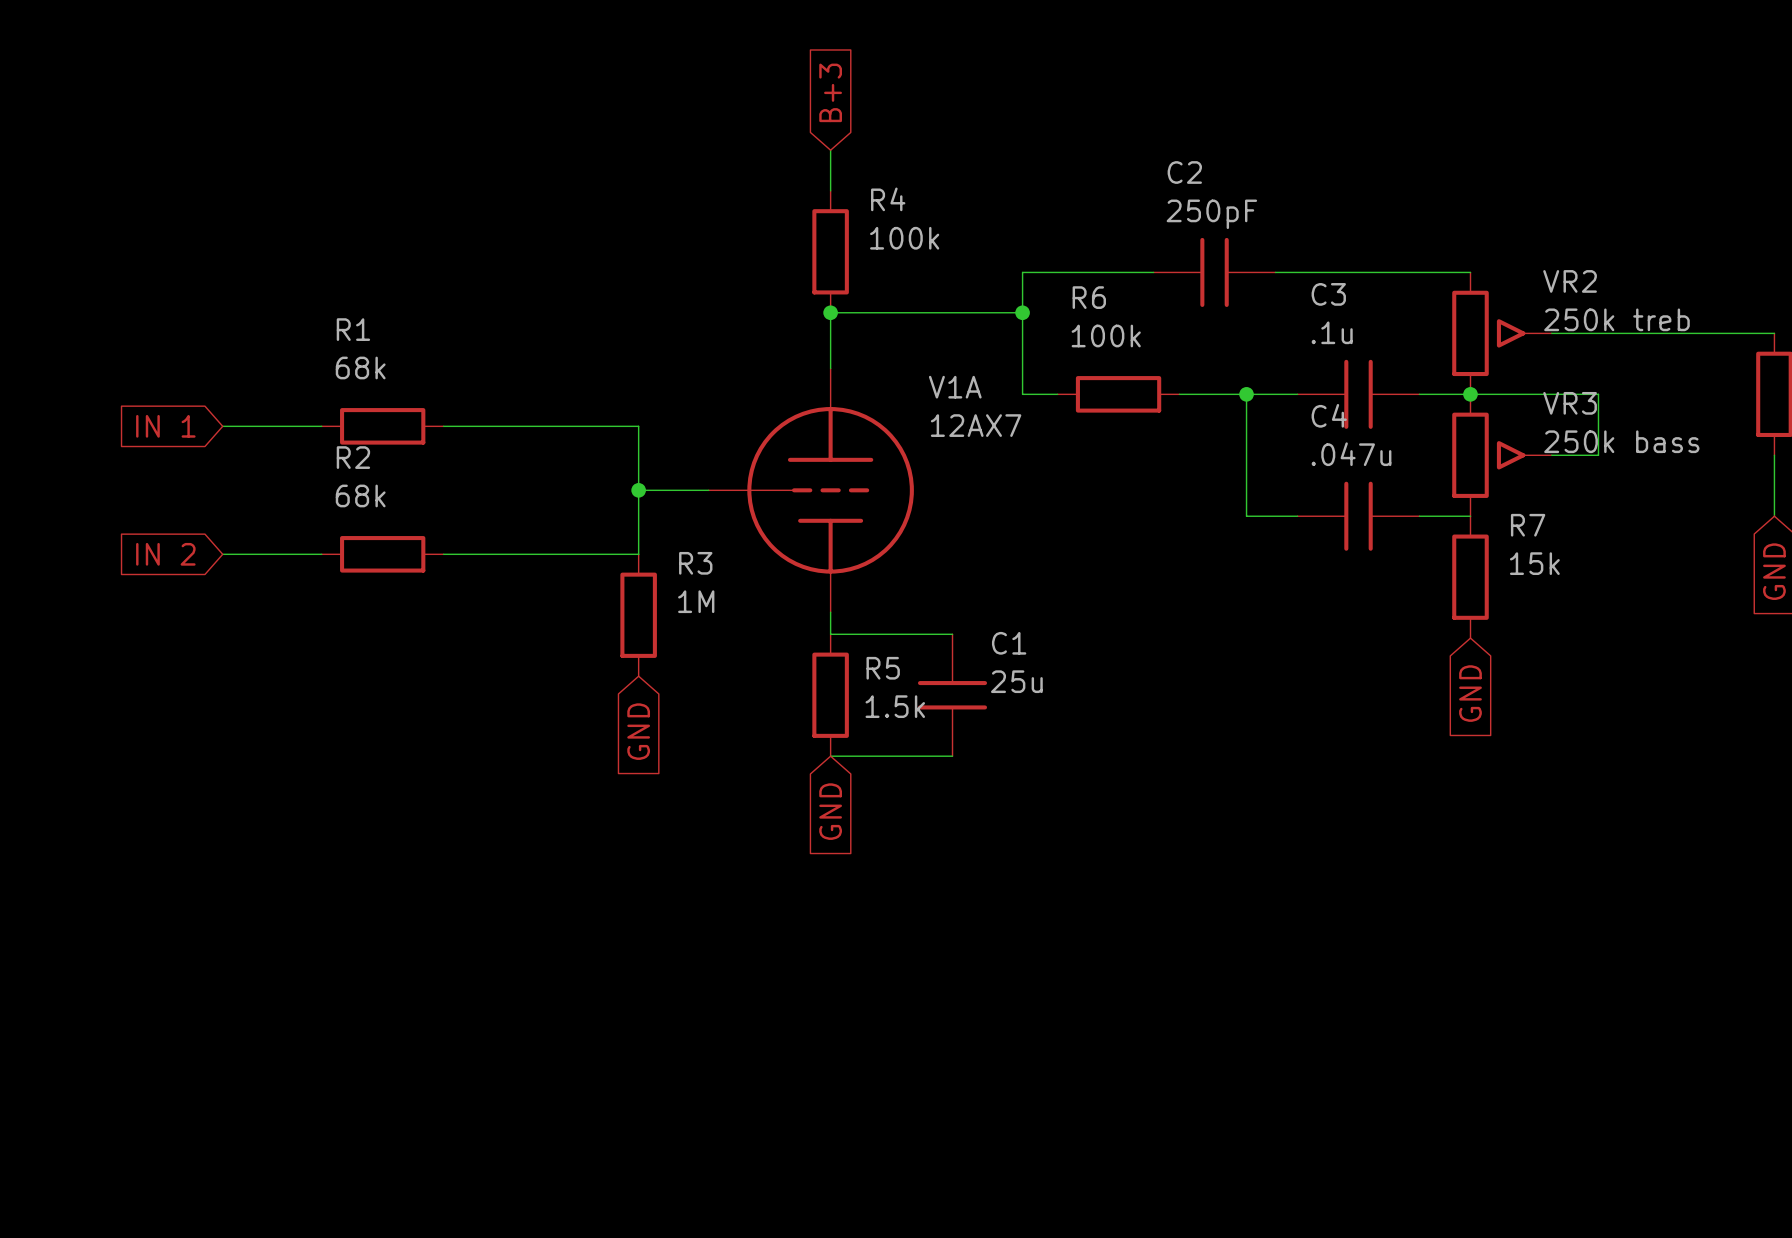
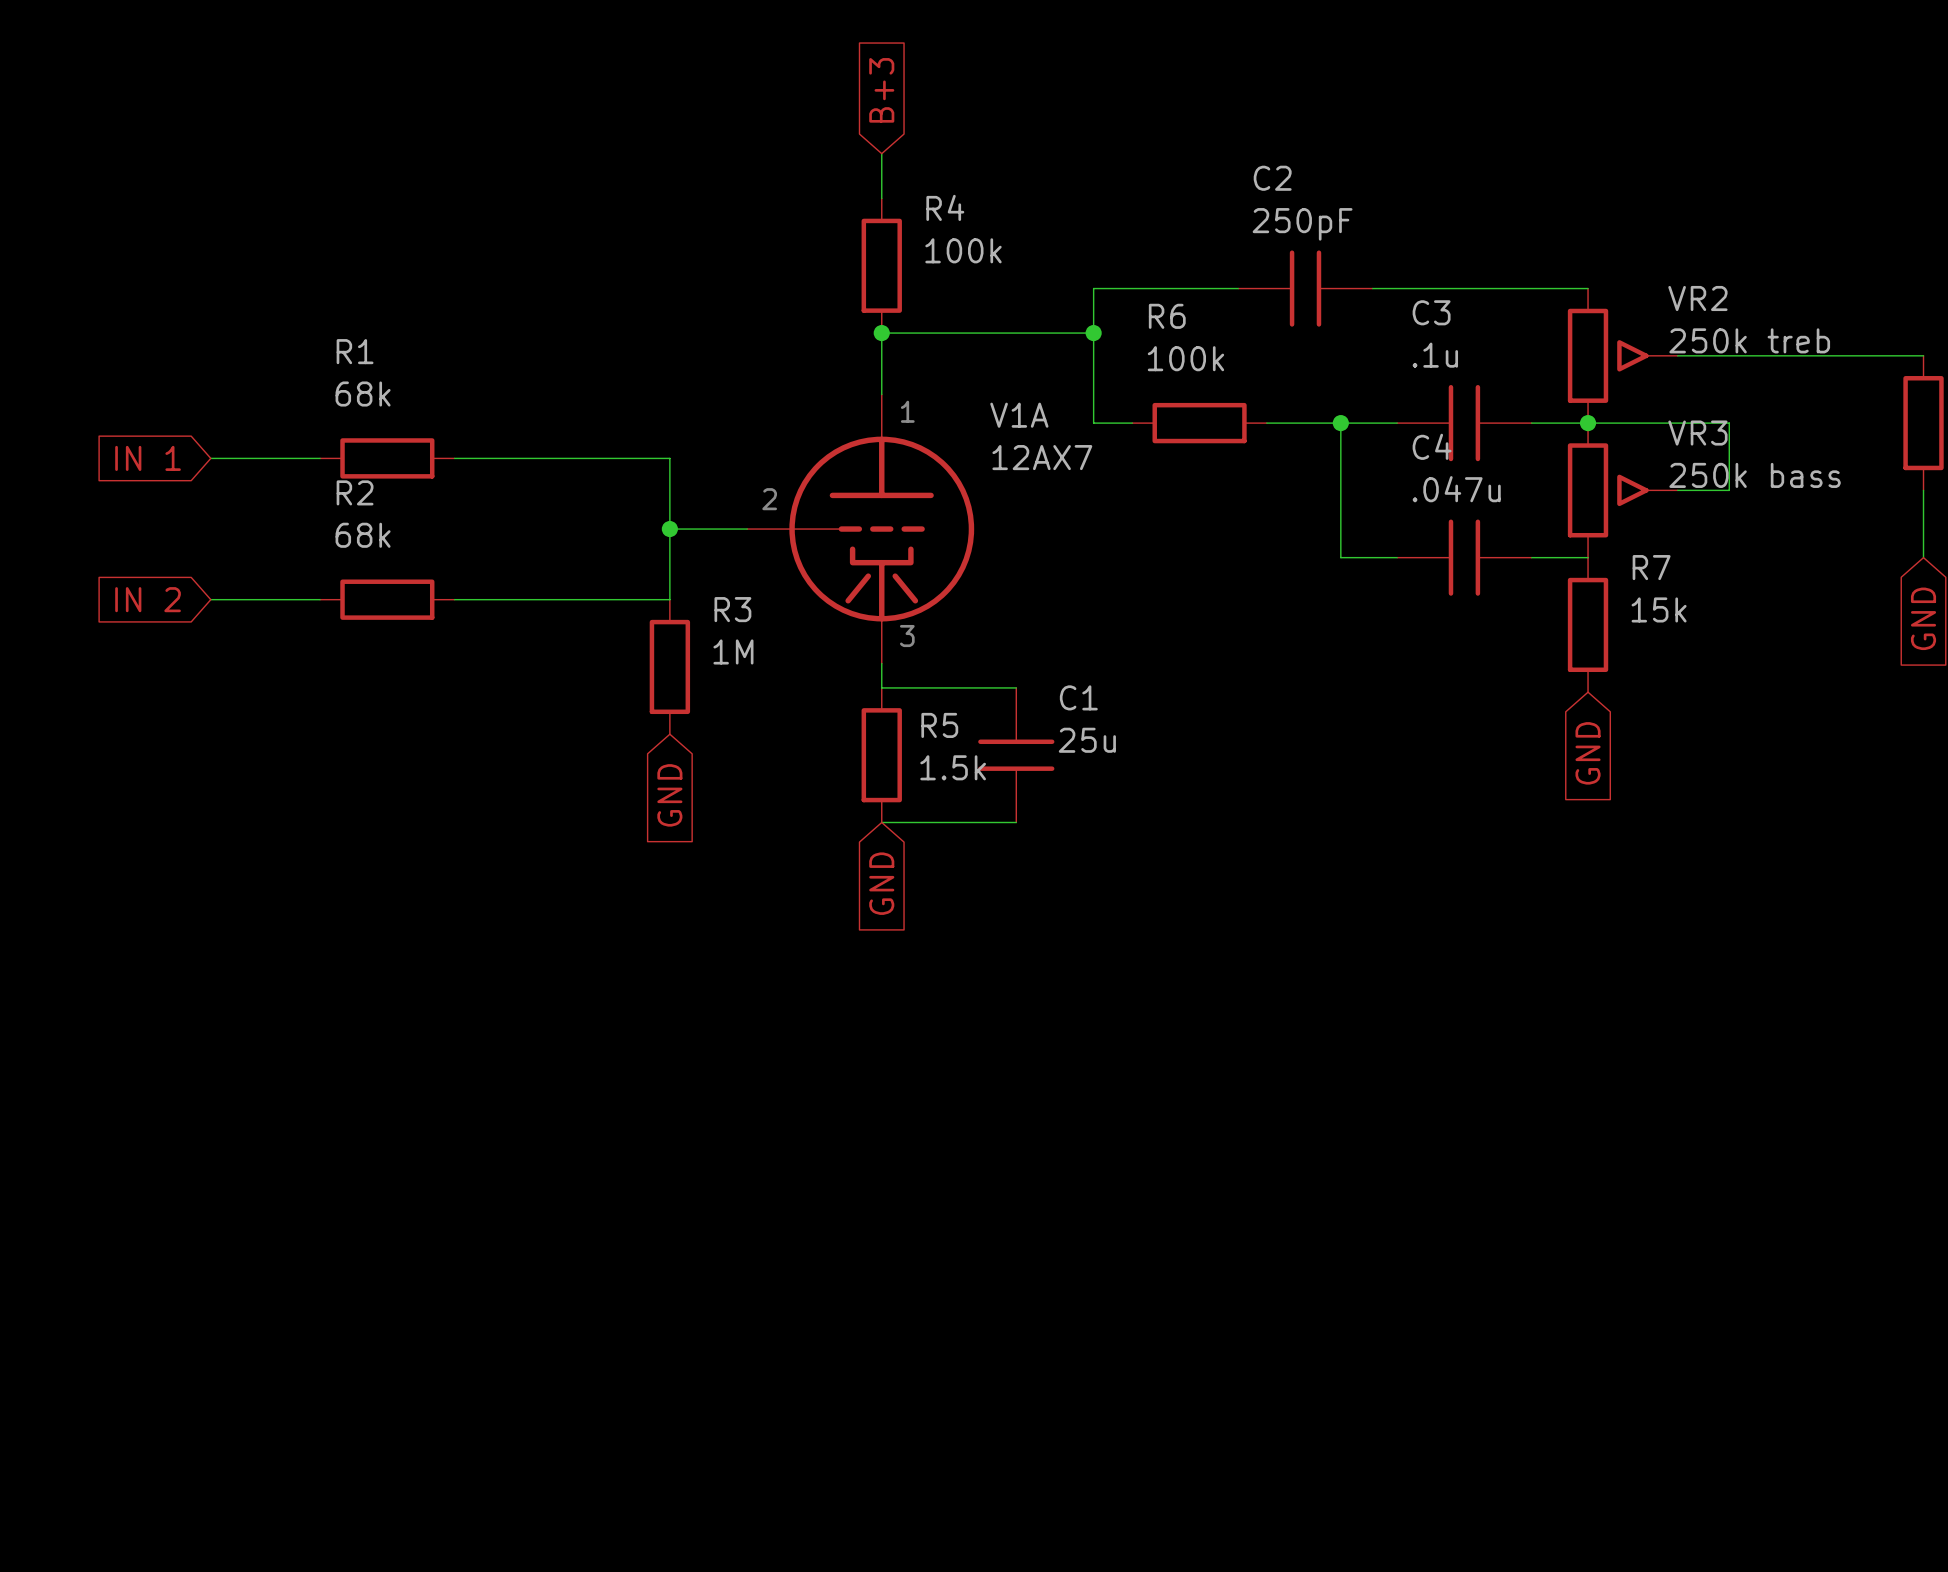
V1A symbol: [708, 368, 914, 613] -> [747, 394, 975, 664]
text: none -> 1 (907, 411)
text: none -> 2 (769, 499)
text: none -> 3 (907, 636)

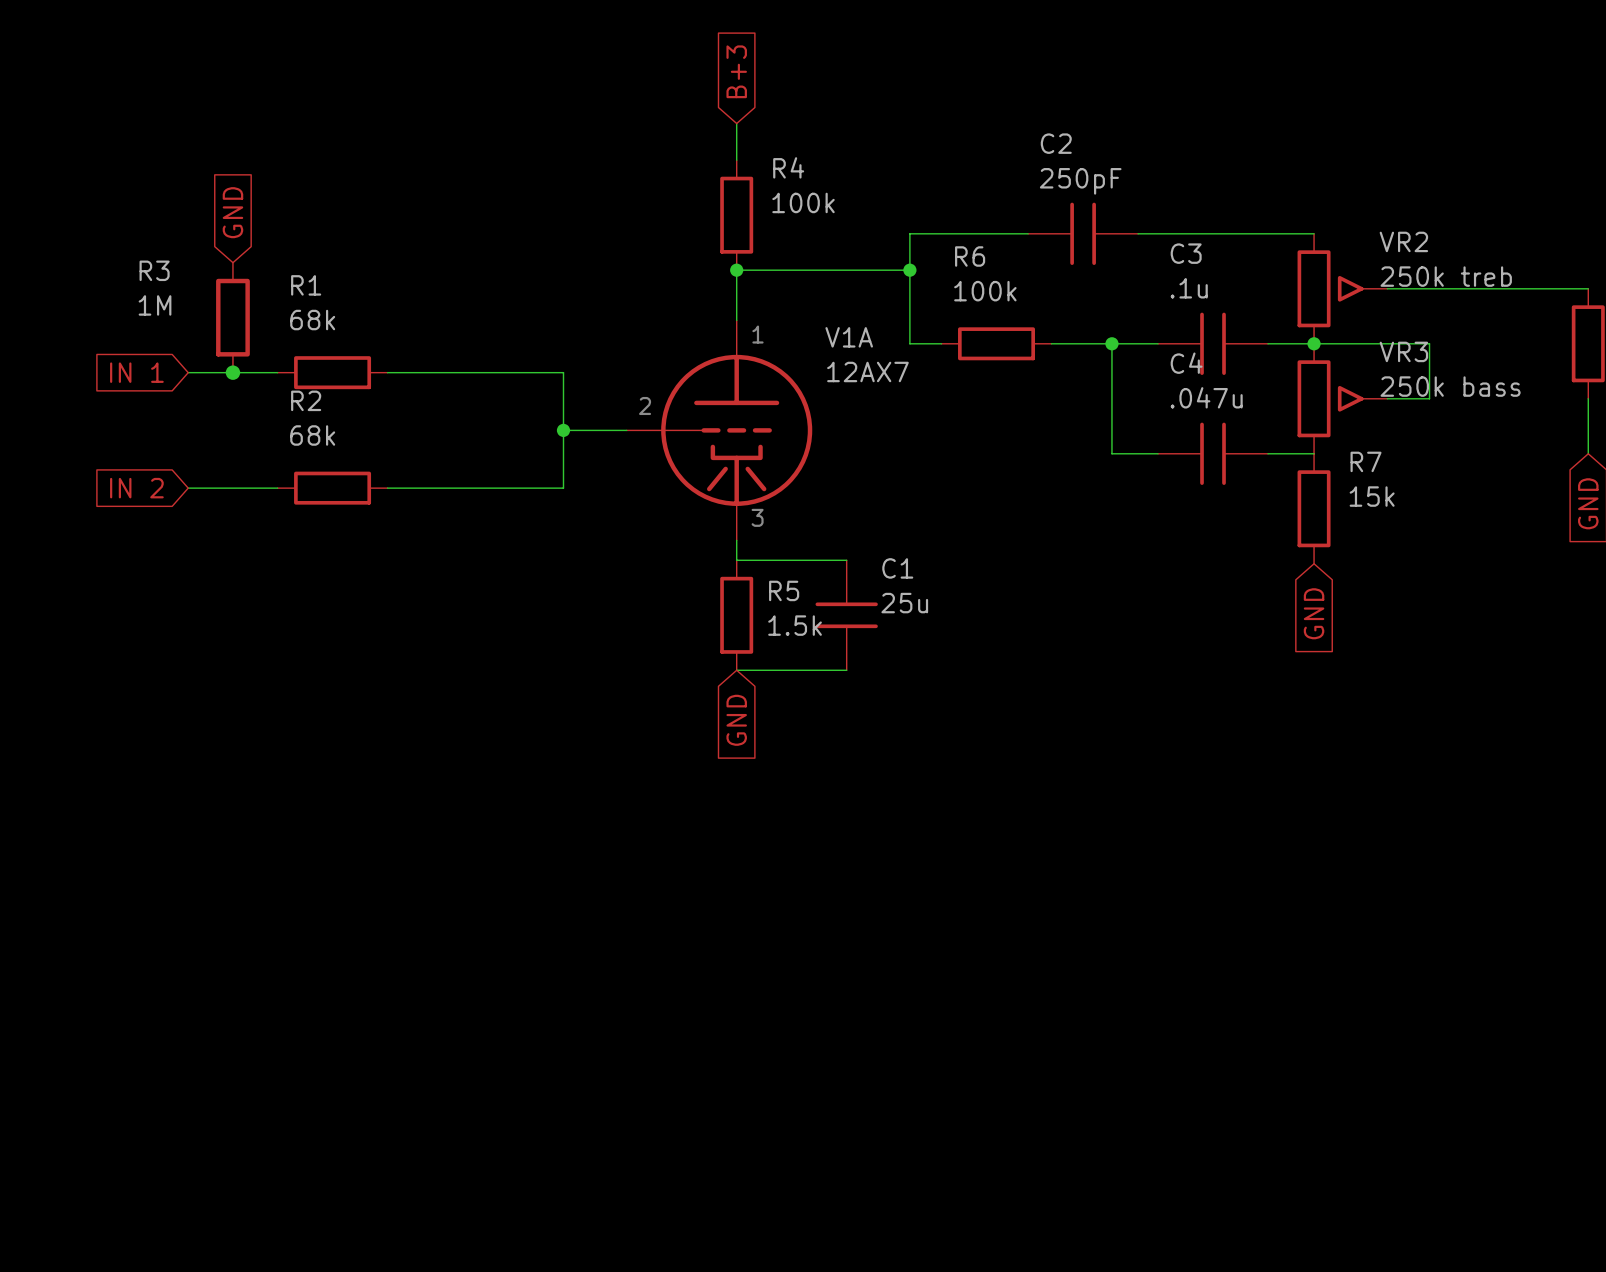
global label: none -> GND (232, 212)
junction: none -> (232, 372)
R3 symbol: [649, 599, 691, 735] -> [216, 262, 250, 373]
R3 name position: R3 (732, 609) -> R3 (154, 270)
R3 value position: 1M (733, 651) -> 1M (155, 305)
global label: GND (669, 795) -> none

